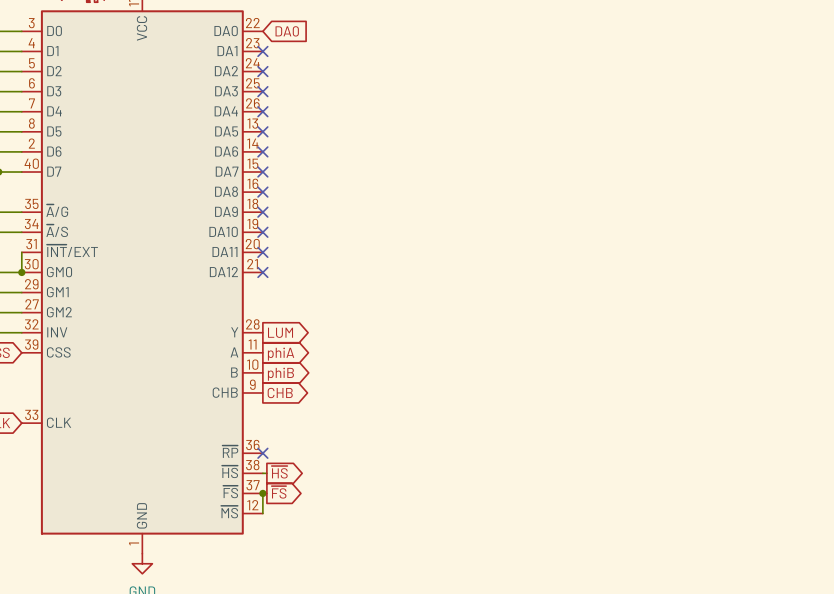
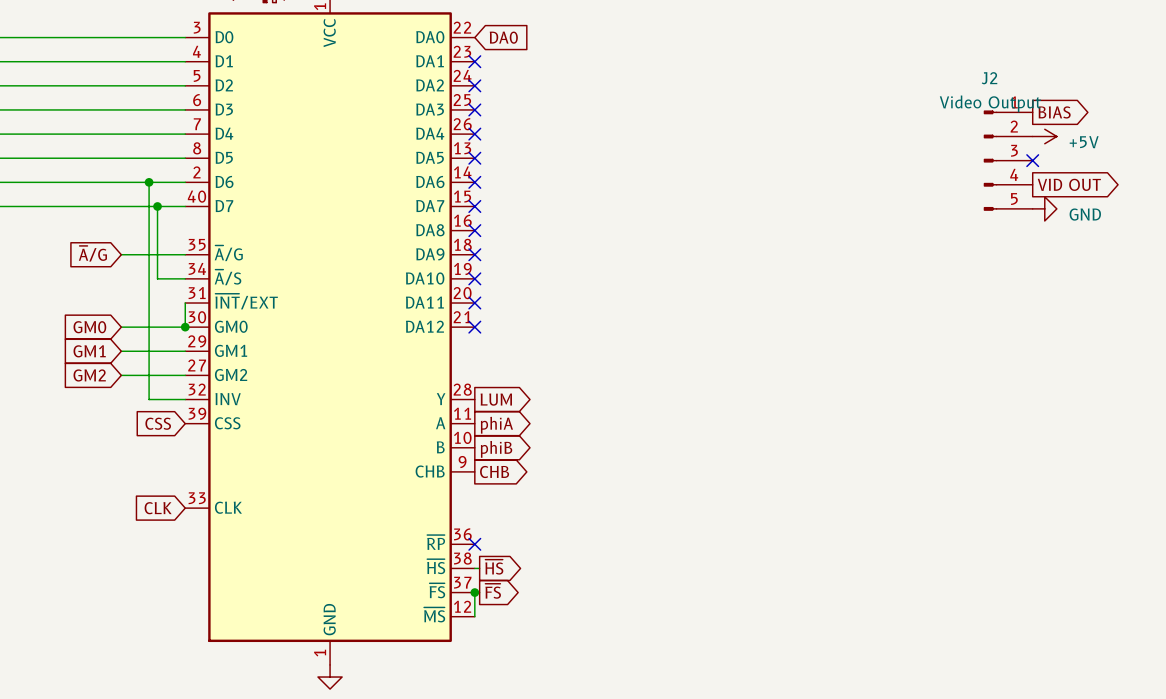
global label: none -> BIAS (1054, 112)
power symbol: none -> +5V (1044, 136)
J2: none -> Video Output (1008, 160)
no-connect mark: none -> (1032, 160)
global label: none -> VID OUT (1069, 184)
power symbol: none -> GND (1044, 208)

